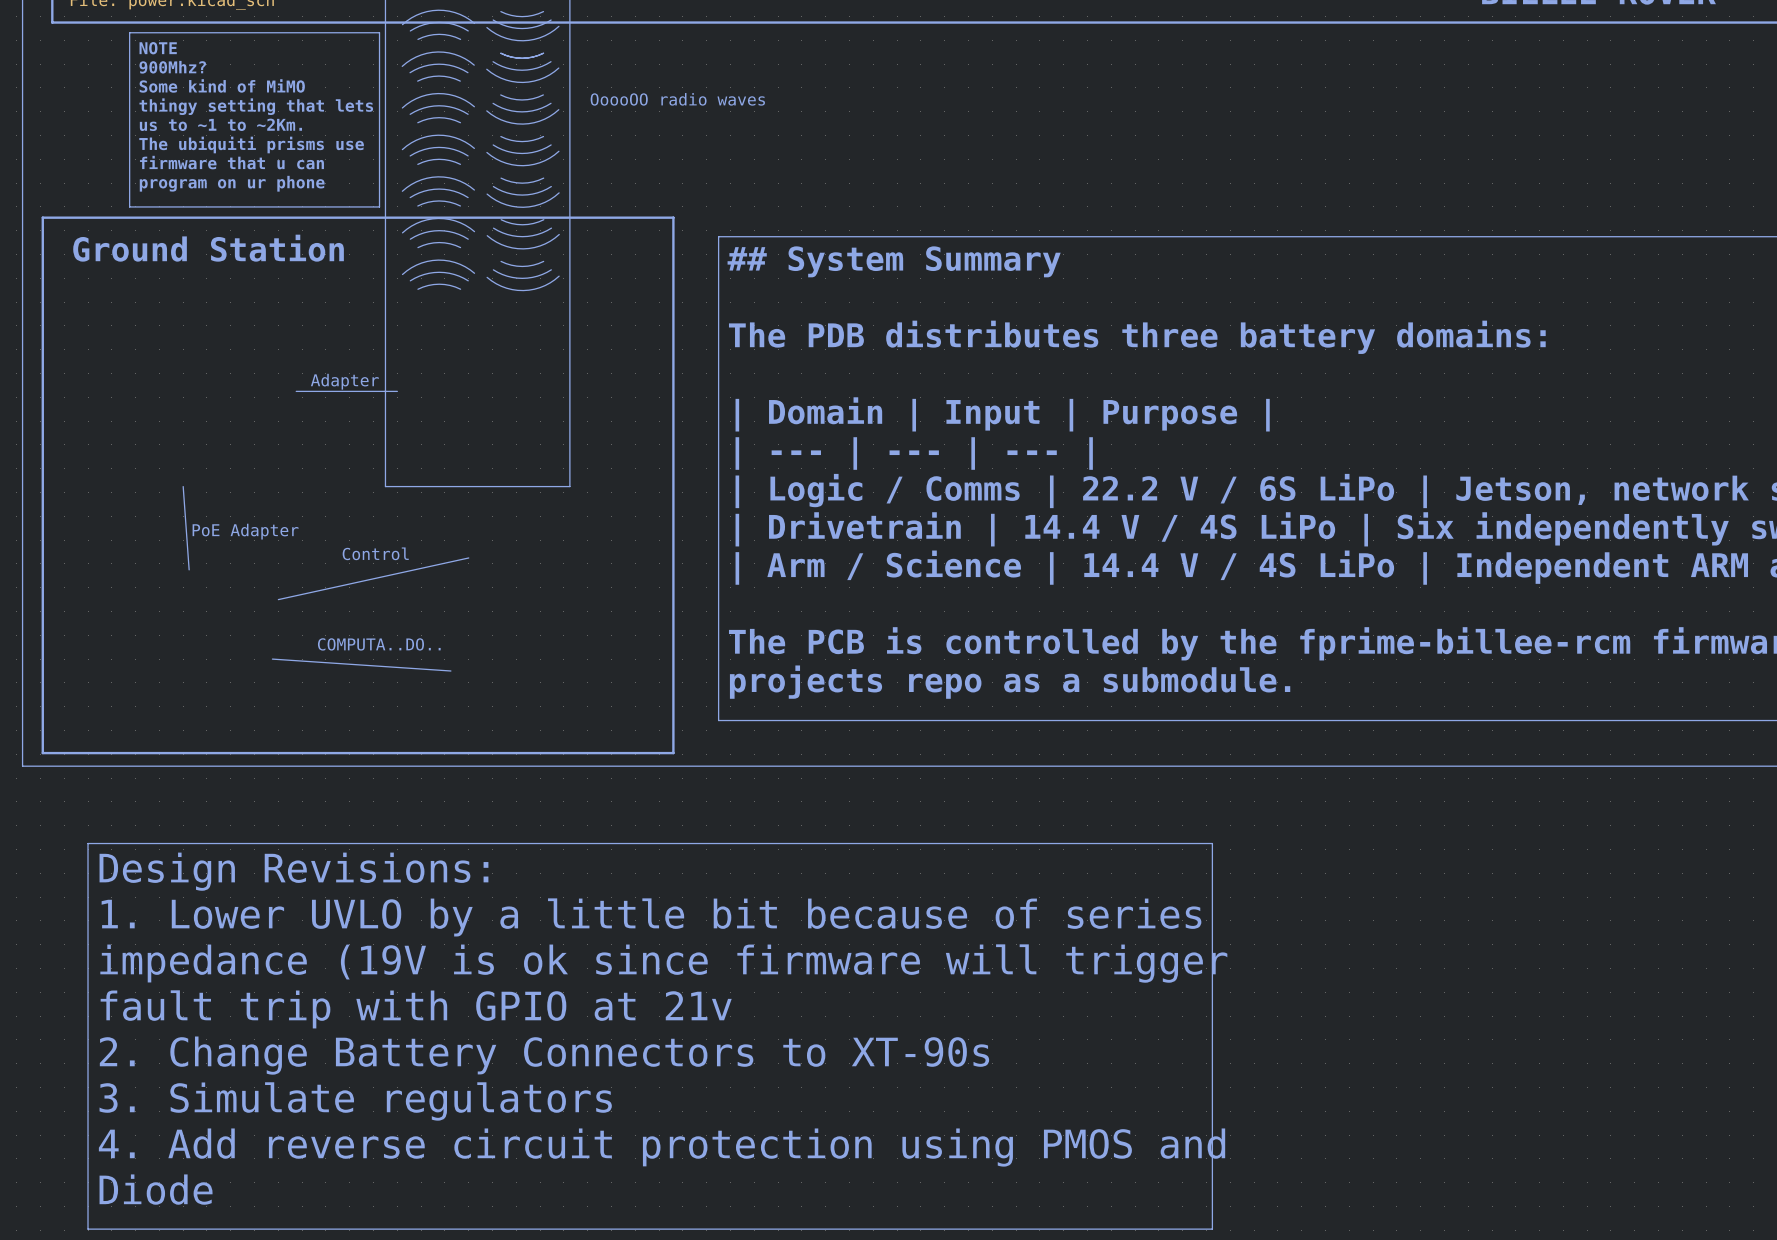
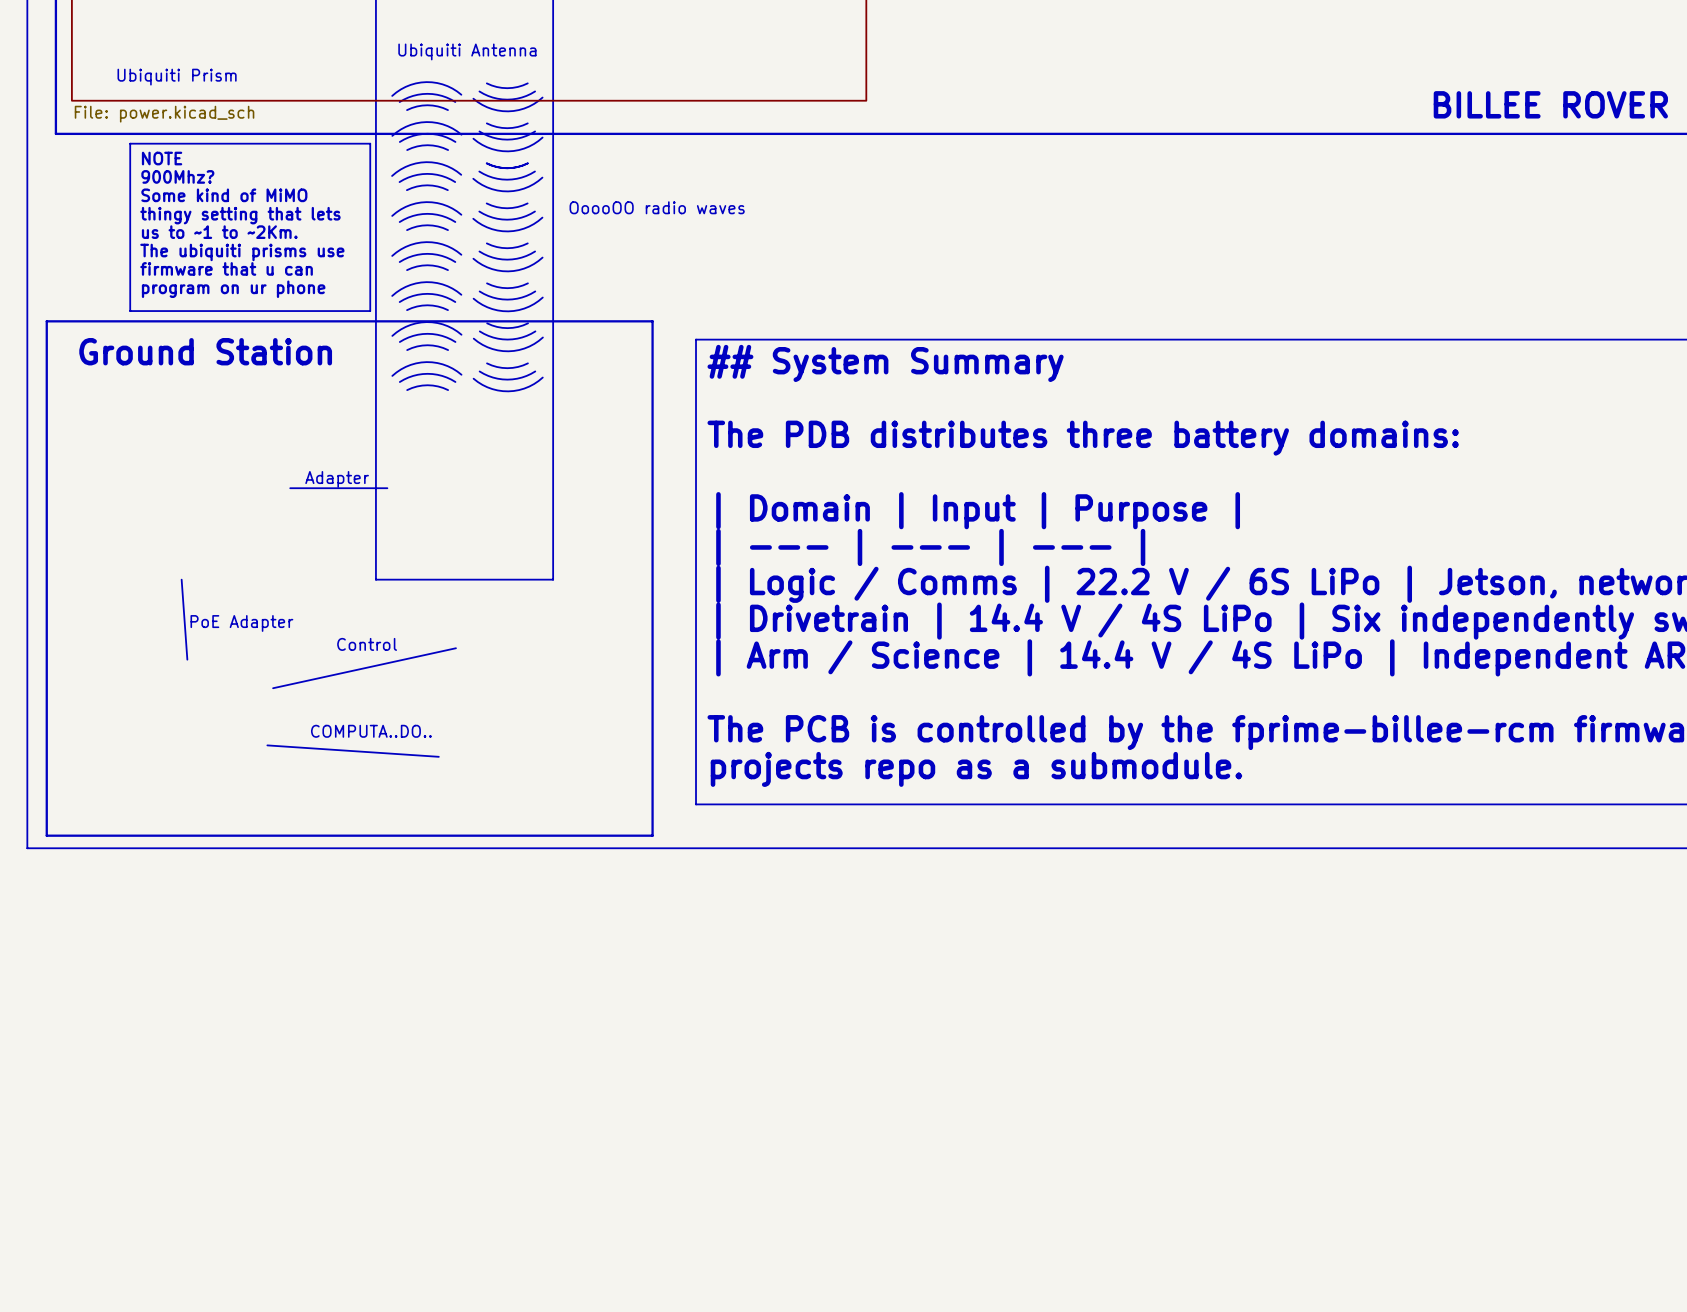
line: (88, 843) (1212, 843) (1212, 1229) (88, 1229) (88, 843) -> none
text: Design Revisions: (293, 871) -> none
text: 1. Lower UVLO by a little bit because of series (651, 917) -> none
text: impedance (19V is ok since firmware will trigger (663, 963) -> none
text: fault trip with GPIO at 21v (416, 1009) -> none
text: 2. Change Battery Connectors to XT-90s (544, 1055) -> none
text: 3. Simulate regulators (355, 1101) -> none
text: 4. Add reverse circuit protection using PMOS and (662, 1147) -> none
text: Diode (156, 1189) -> none

